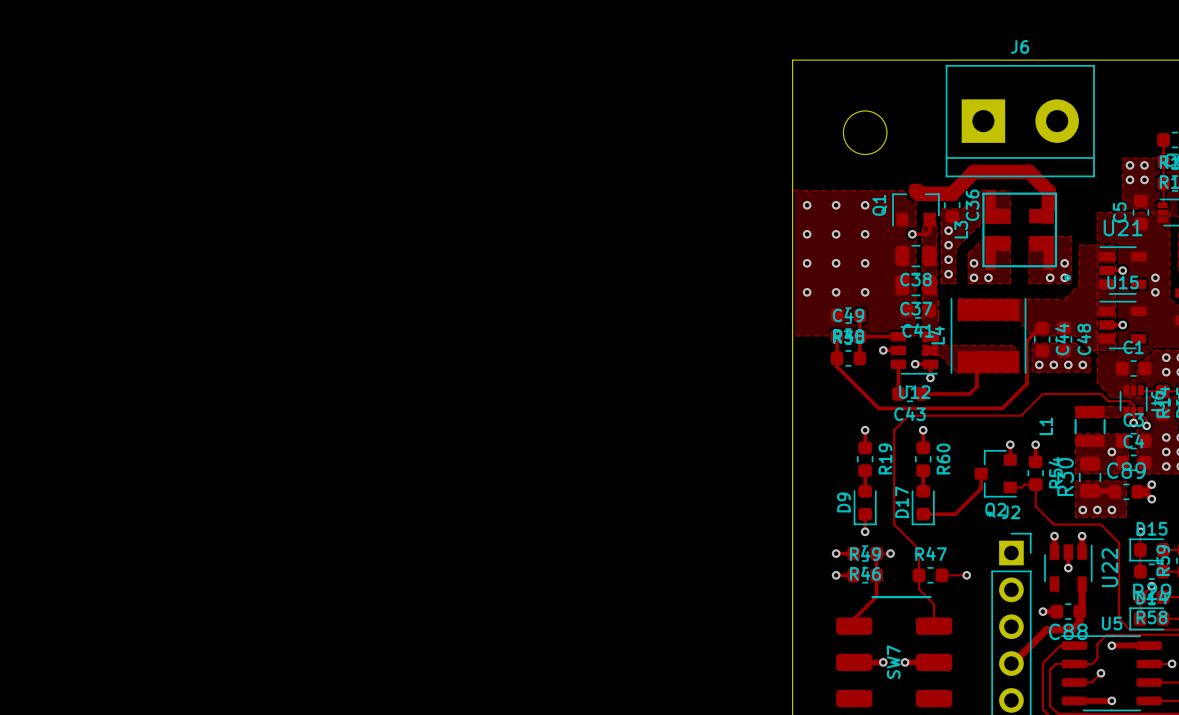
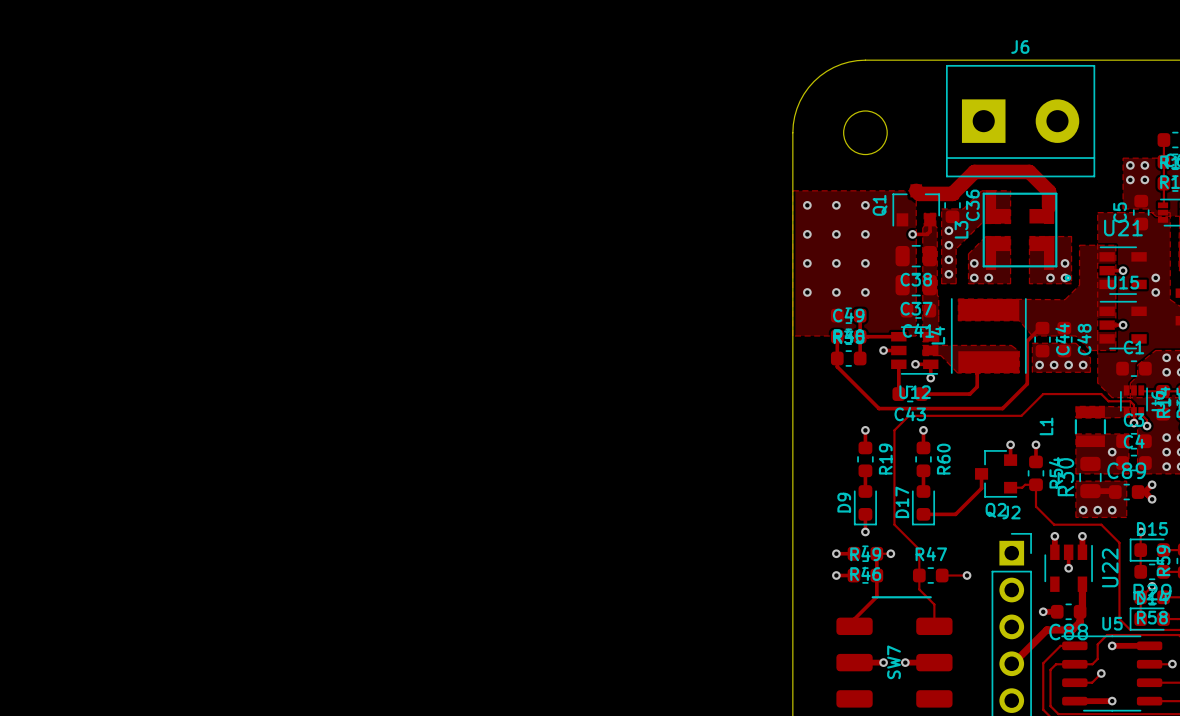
board edge: (865, 60) (792, 60) (792, 132) -> (865, 60) (849, 62) (833, 67) (814, 81) (803, 94) (796, 108) (792, 132)

